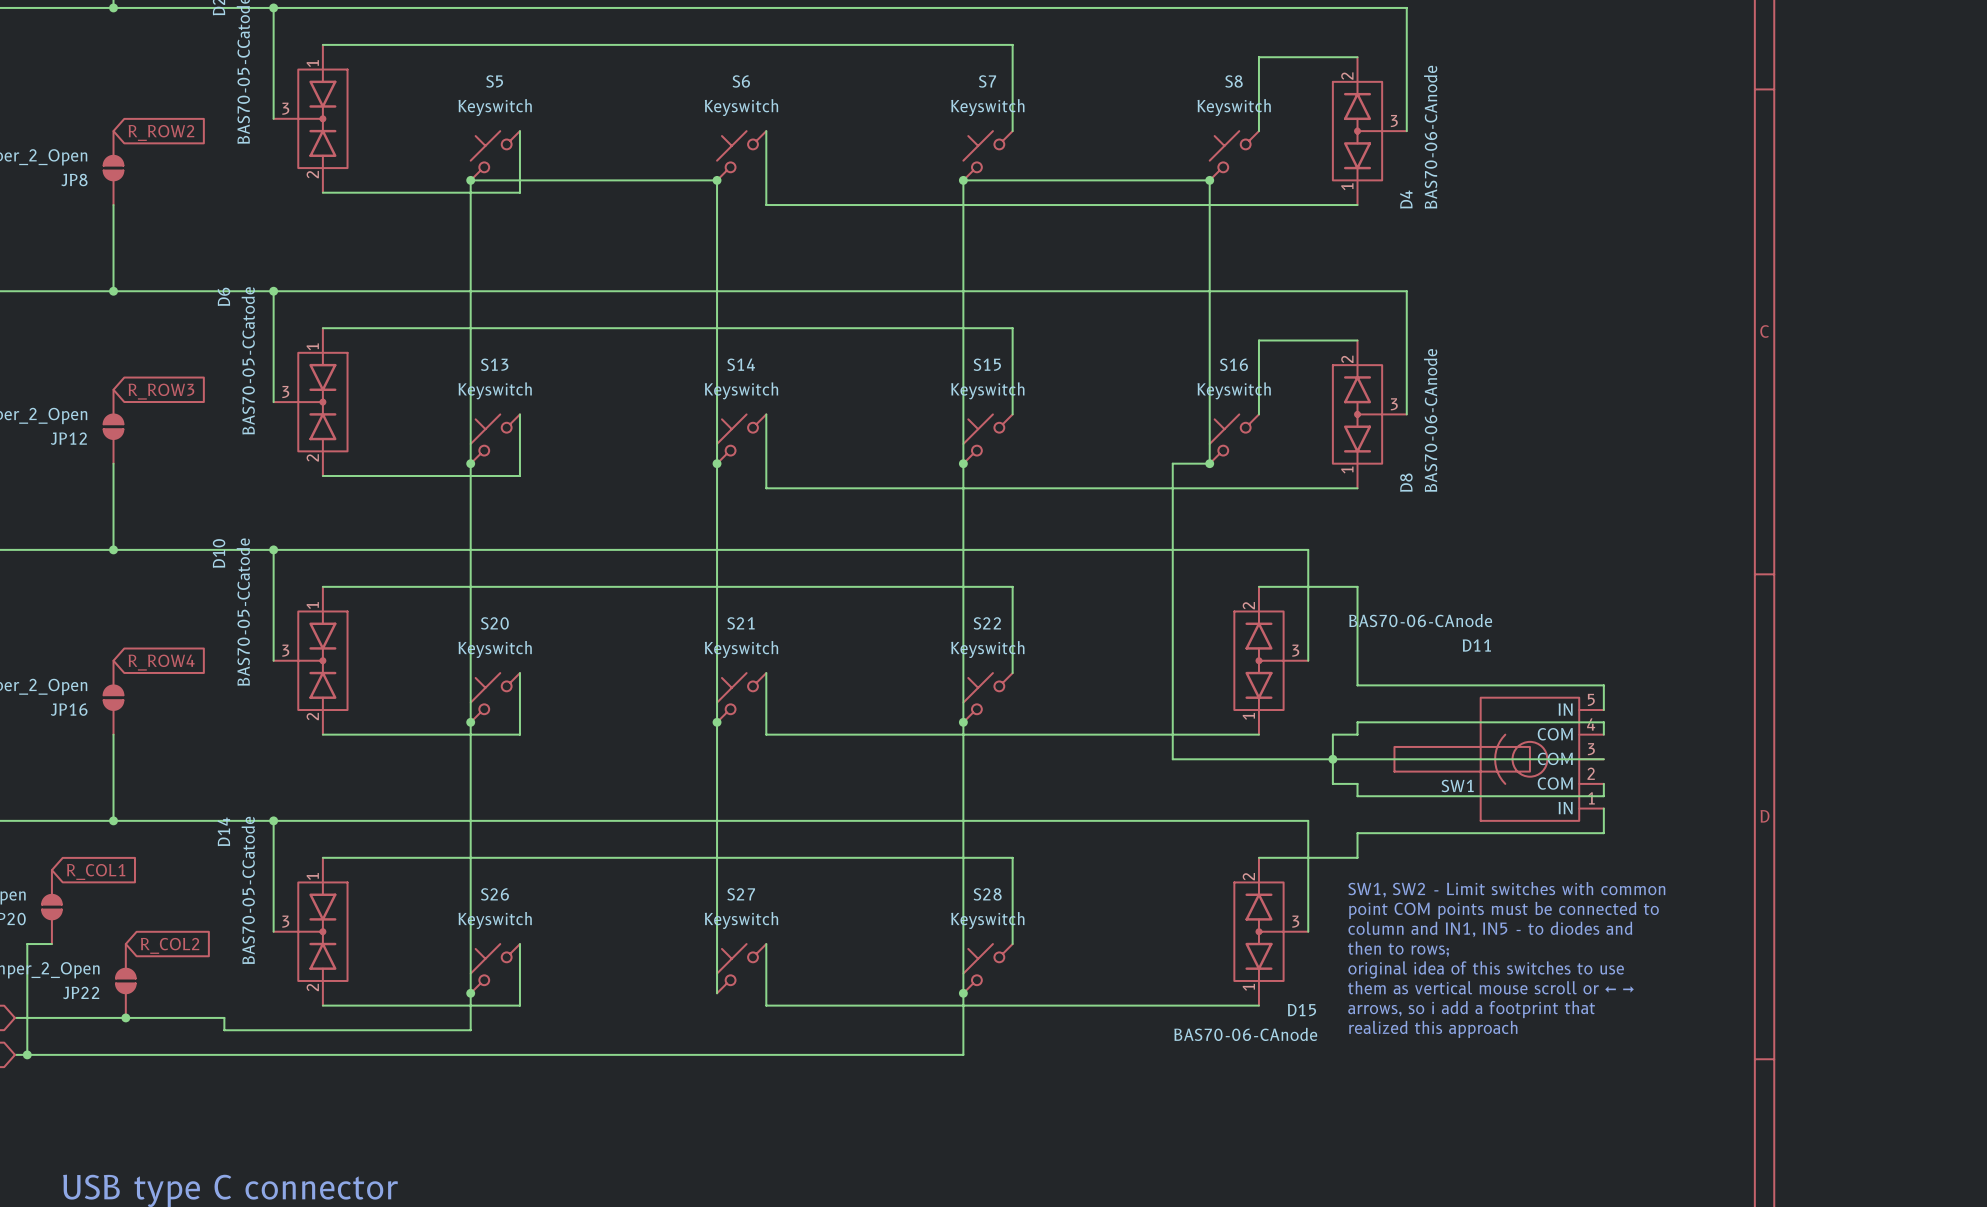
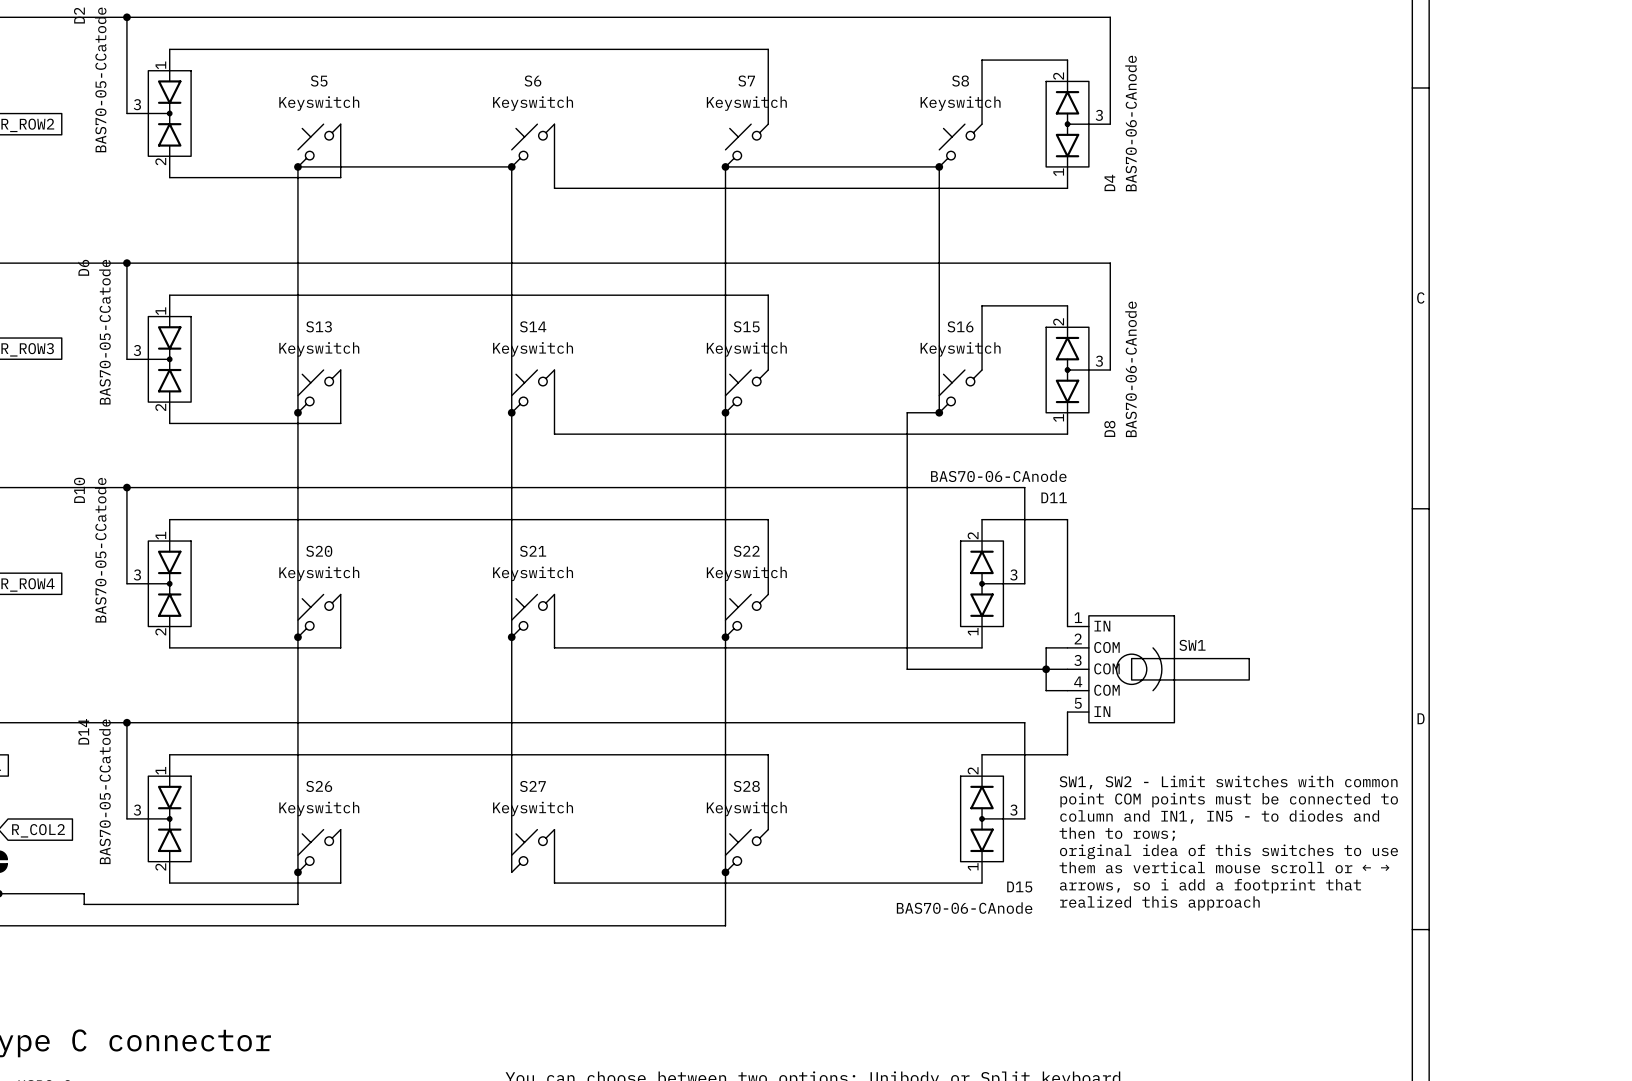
D11 value position: BAS70-06-CAnode (1420, 620) -> BAS70-06-CAnode (998, 476)
D11 name position: D11 (1476, 645) -> D11 (1054, 497)
wire: (1357, 685) (1603, 685) (1603, 710) -> (1067, 605) (1067, 626)
wire: (1357, 734) (1357, 722) (1603, 722) (1603, 734) -> none
wire: (1357, 759) (1603, 759) -> none
SW1 rotation: 0° (1486, 759) -> 180° (1169, 669)
wire: (1357, 783) (1357, 796) (1603, 796) (1603, 783) -> none
wire: (1603, 808) (1603, 833) (1357, 833) -> (1067, 712) (1067, 733)

